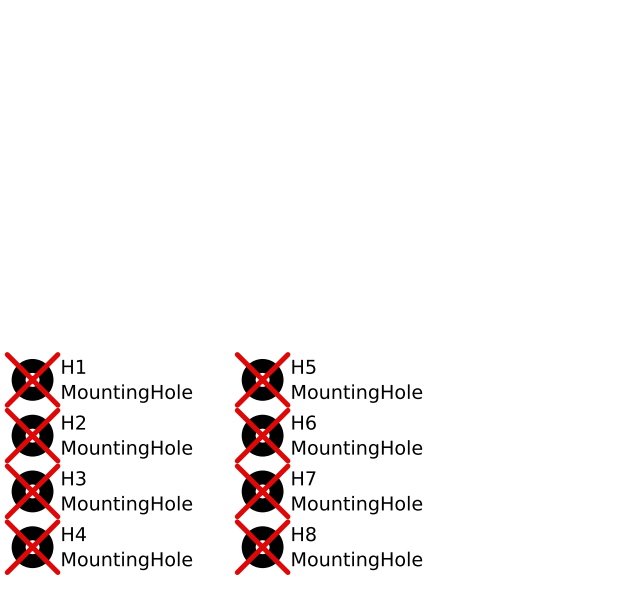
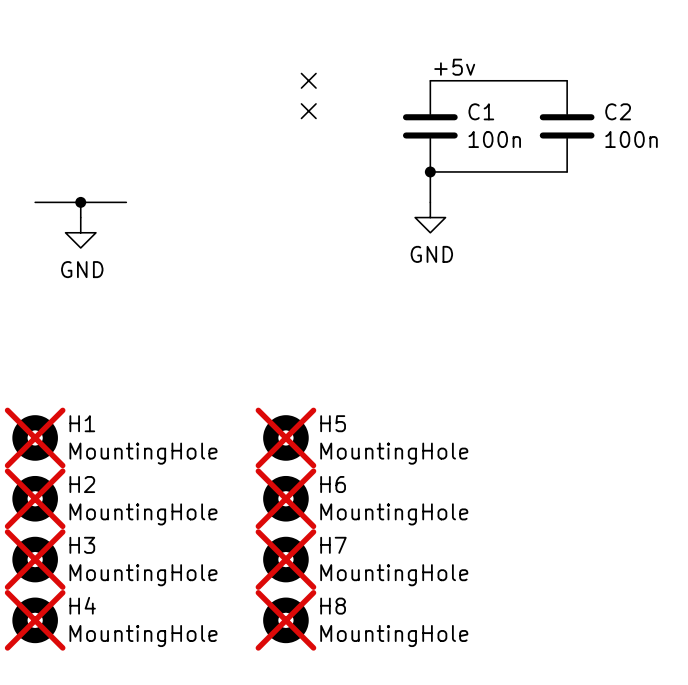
label: none -> +5v (454, 67)
no-connect mark: none -> (308, 80)
wire: none -> (430, 80) (567, 80)
no-connect mark: none -> (308, 111)
C1: none -> 100n (430, 126)
C2: none -> 100n (567, 126)
junction: none -> (430, 171)
wire: none -> (567, 171) (430, 171) (430, 202)
wire: none -> (35, 202) (126, 202)
wire: none -> (80, 202) (80, 217)
junction: none -> (80, 202)
power symbol: none -> GND (430, 217)
power symbol: none -> GND (80, 232)

